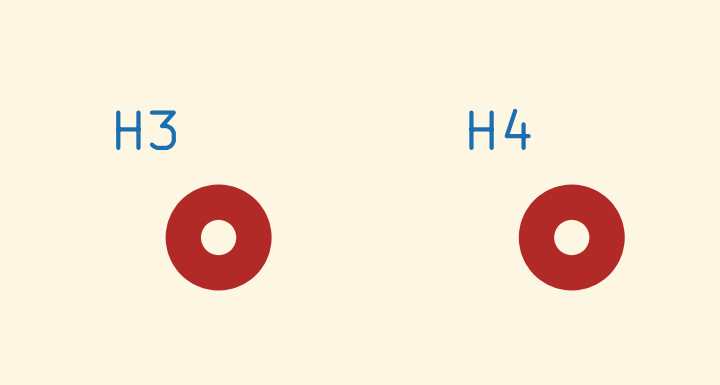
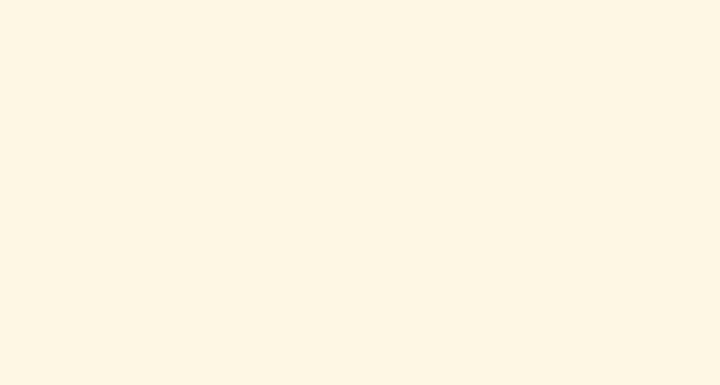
H3: (218, 237) -> none
H4: (571, 237) -> none

